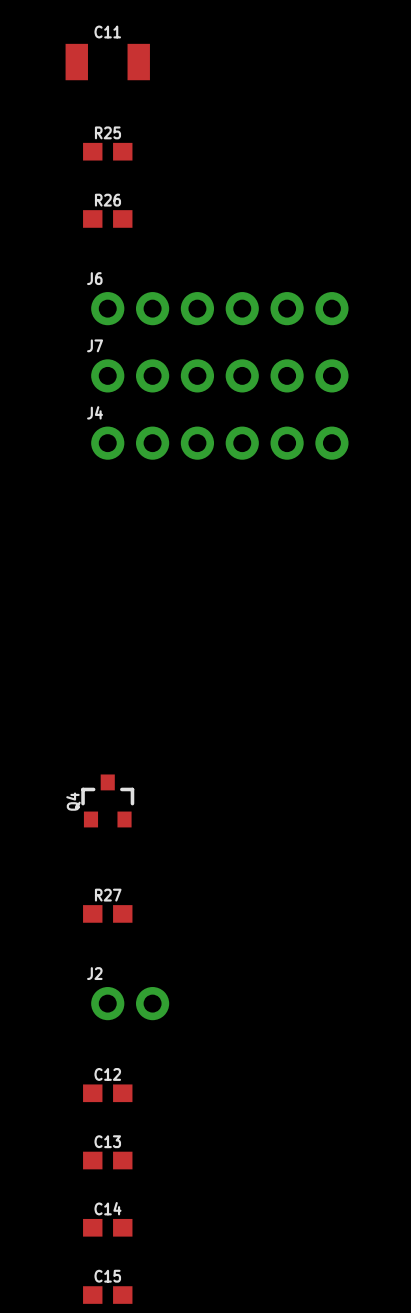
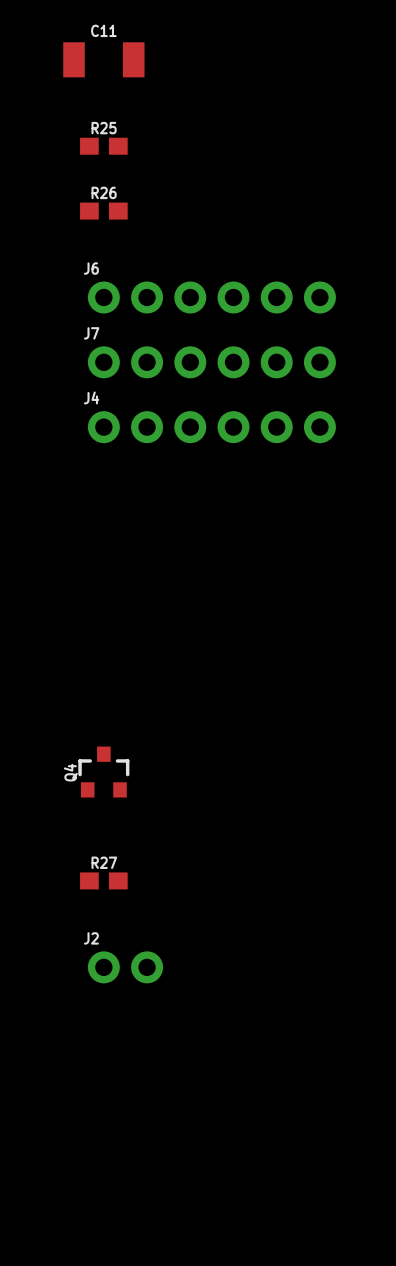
C12: (107, 1093) -> none
C13: (107, 1160) -> none
C14: (107, 1227) -> none
C15: (107, 1295) -> none

